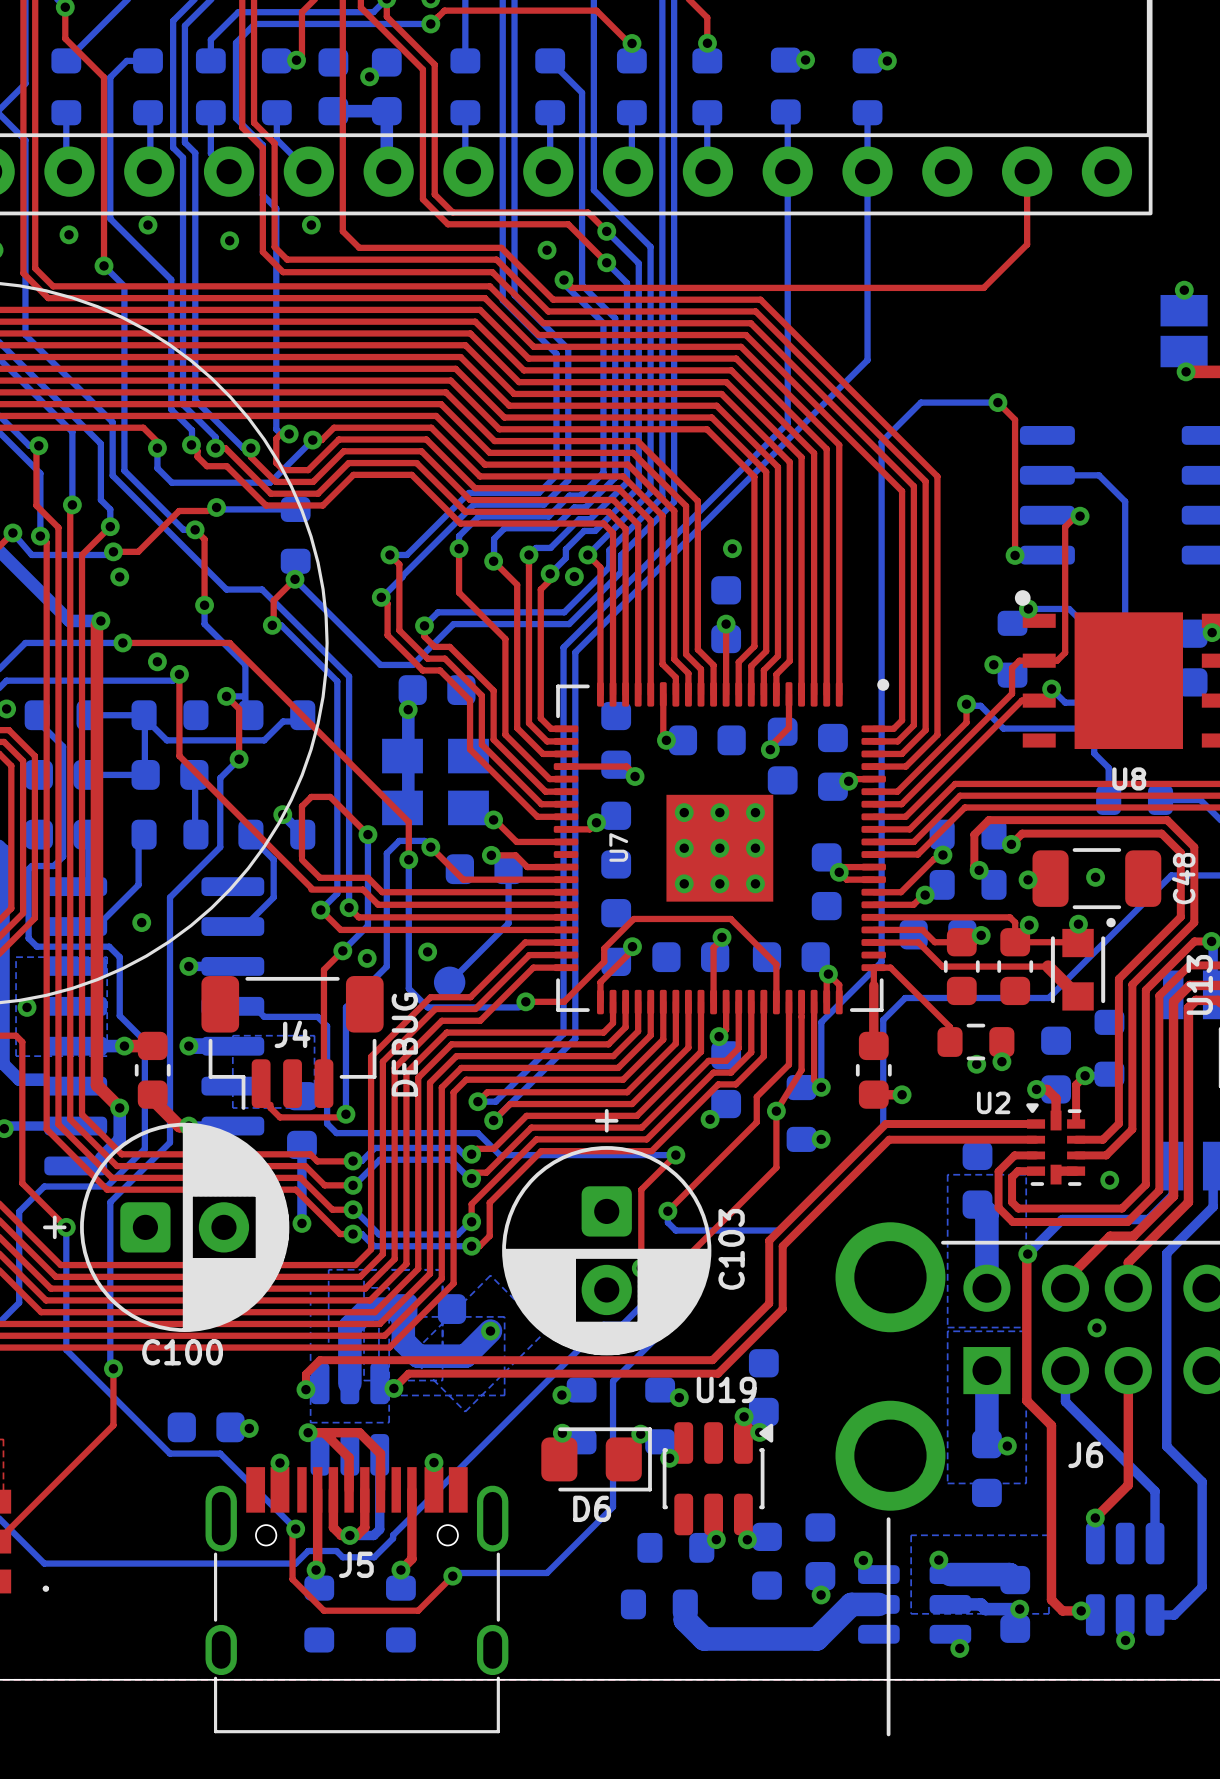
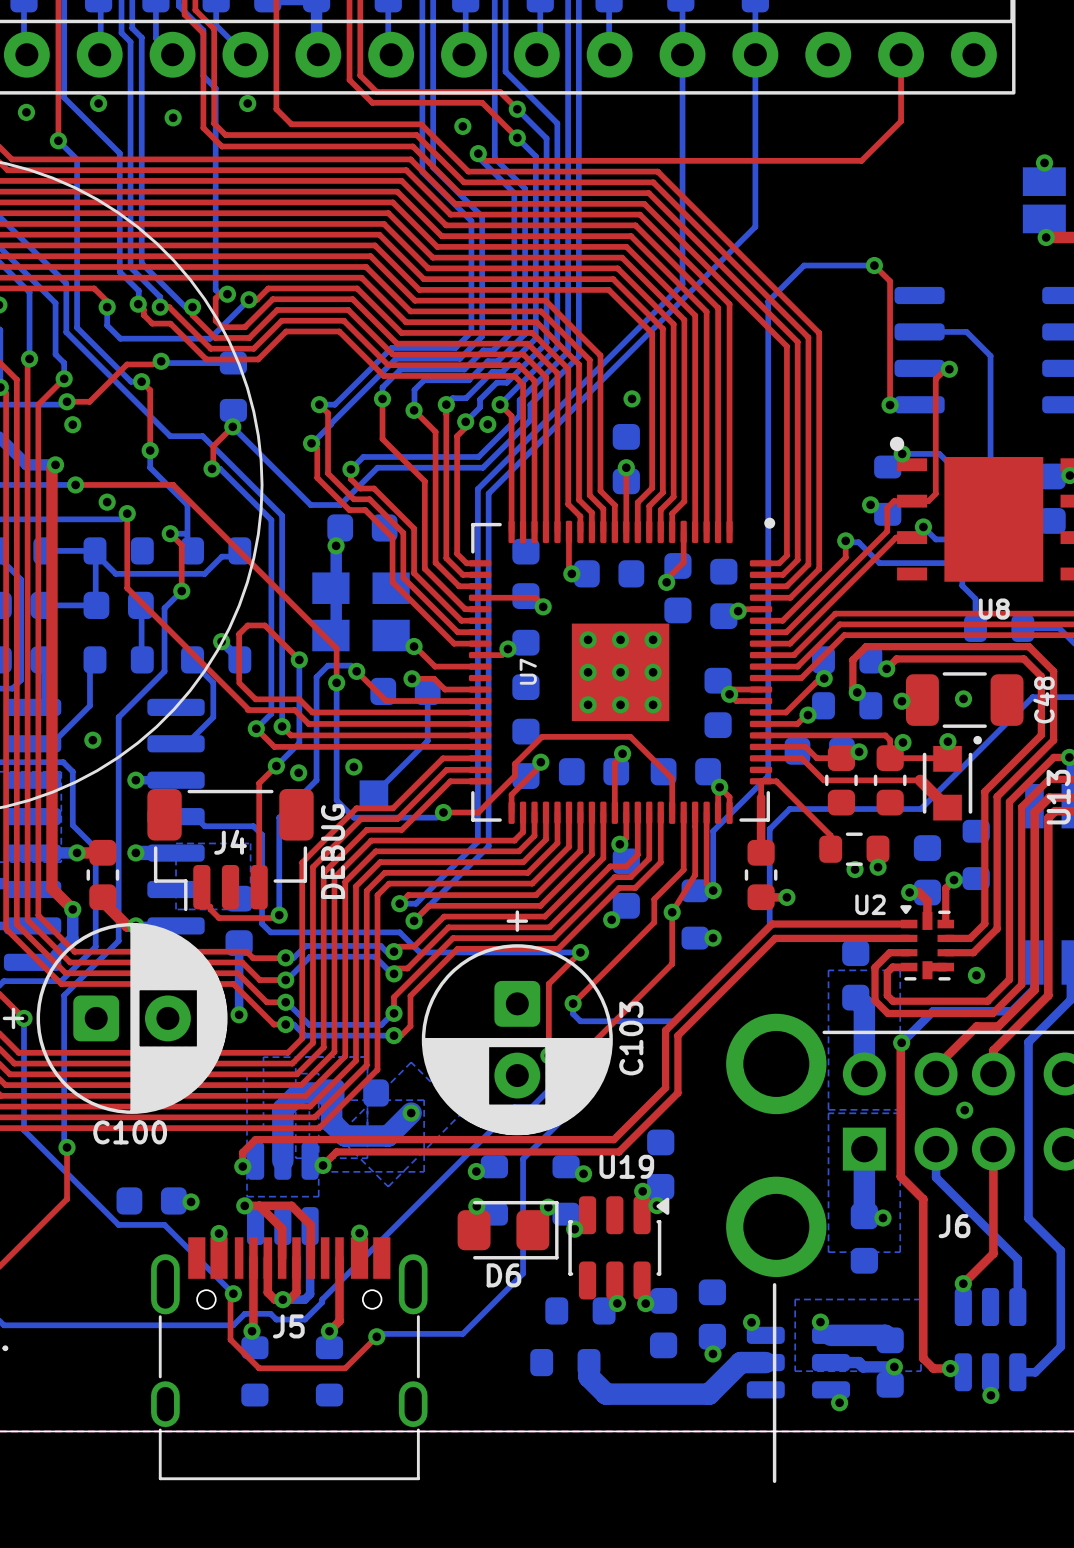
part footprint: [433, 966, 466, 999] -> [359, 780, 389, 810]

